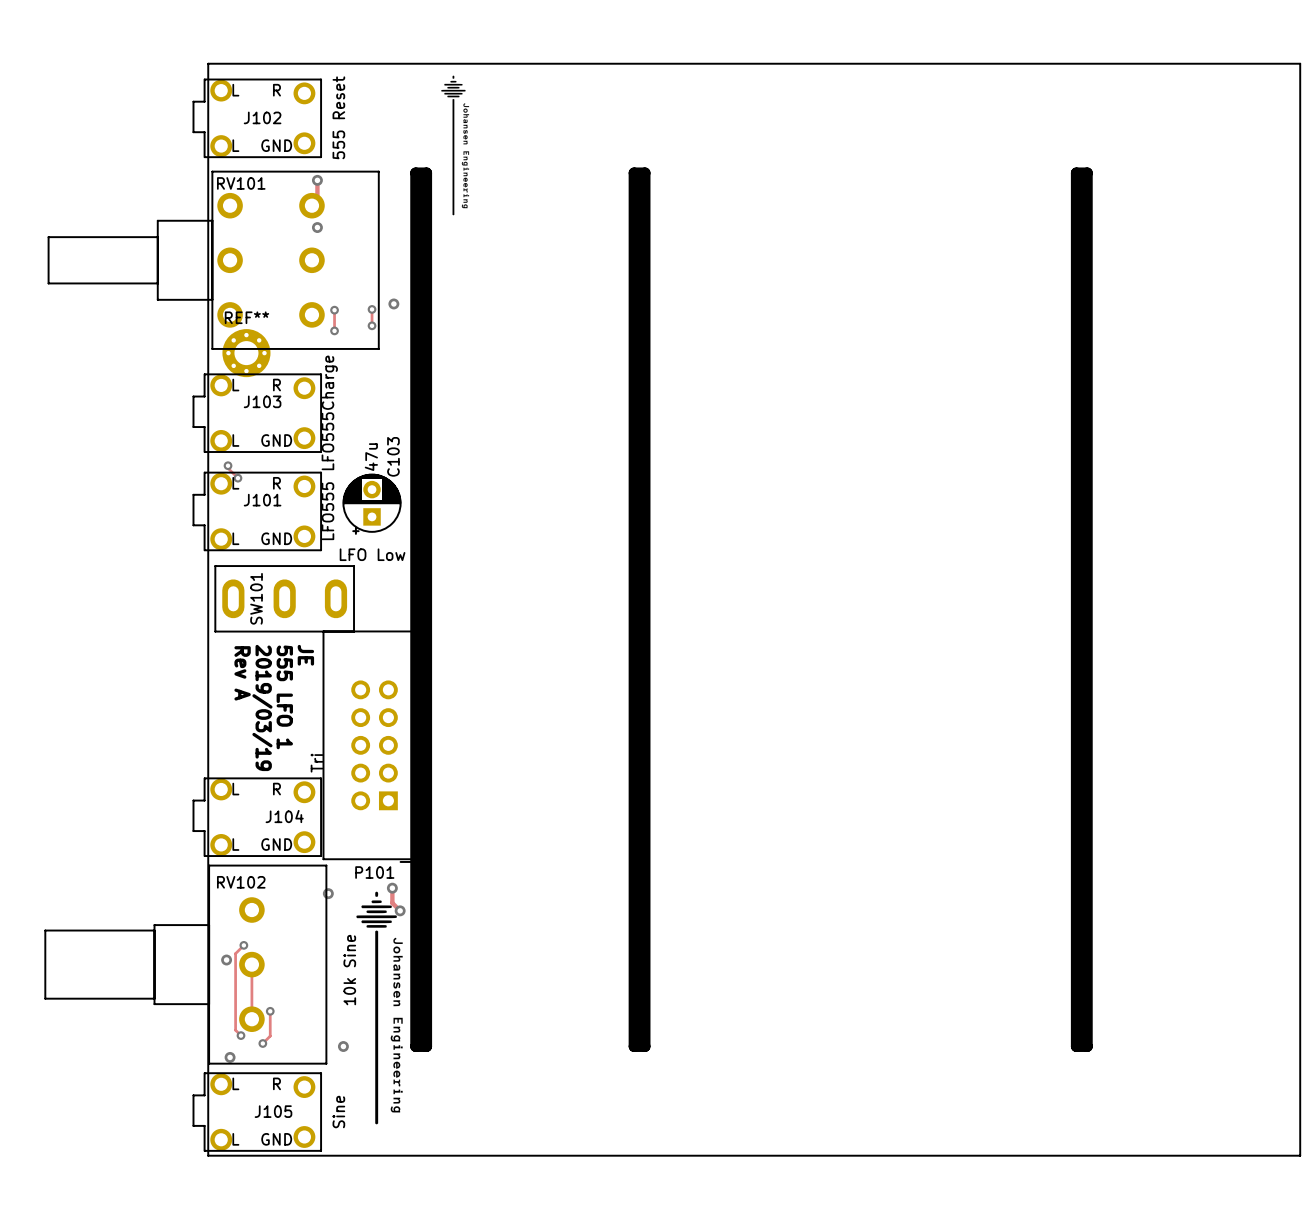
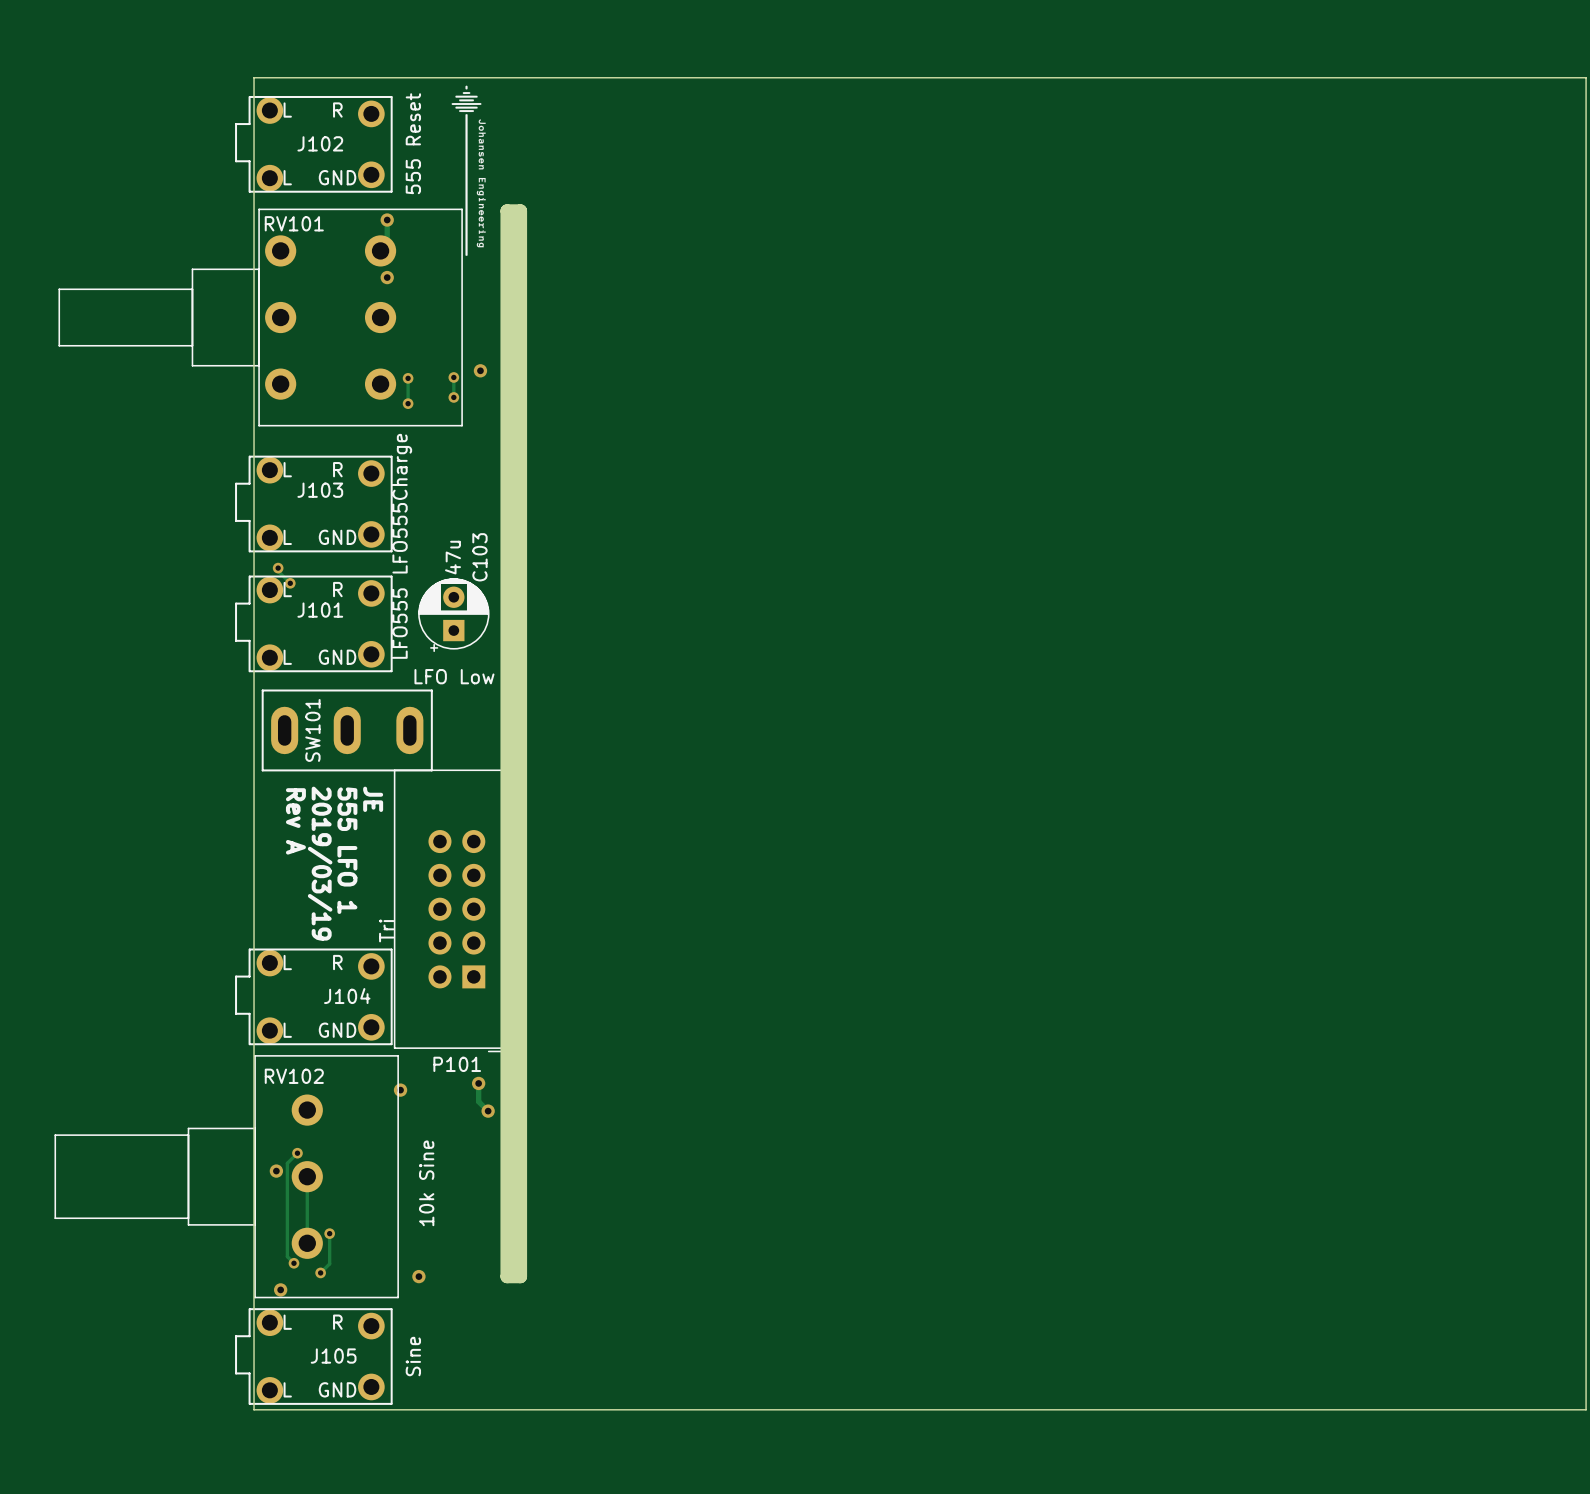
drawing position: (455, 145) -> (468, 170)
board edge: (634, 172) (645, 172) (645, 1046) (634, 1046) (634, 172) -> none
board edge: (1076, 172) (1087, 172) (1087, 1046) (1076, 1046) (1076, 172) -> none
REF**: (246, 353) -> none
drawing: [356, 891, 403, 1125] -> none

